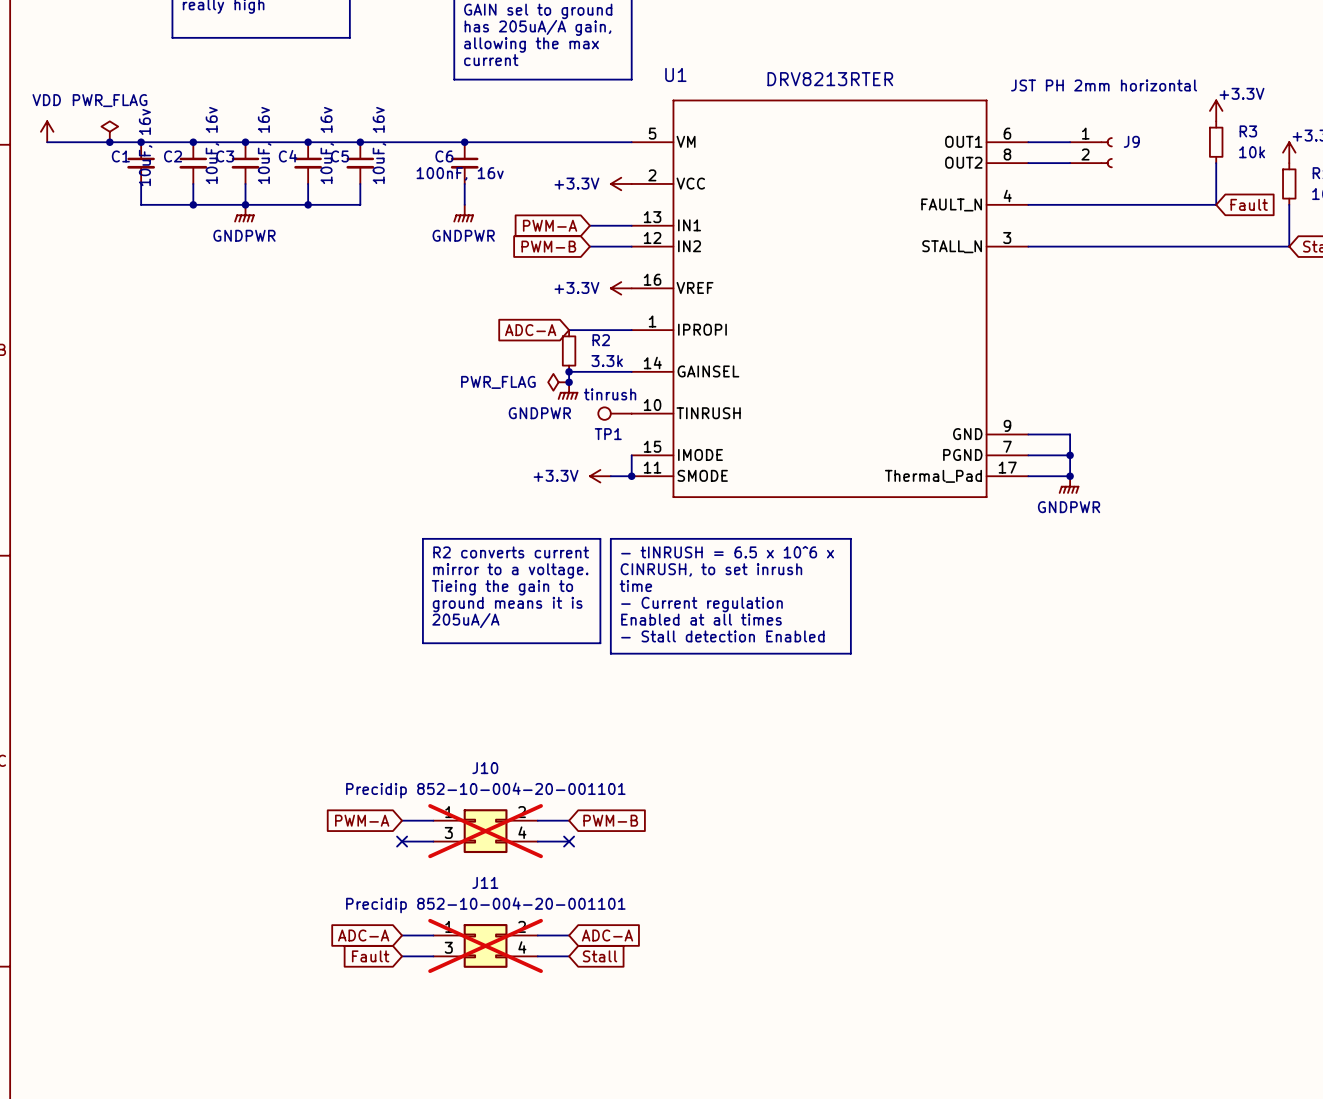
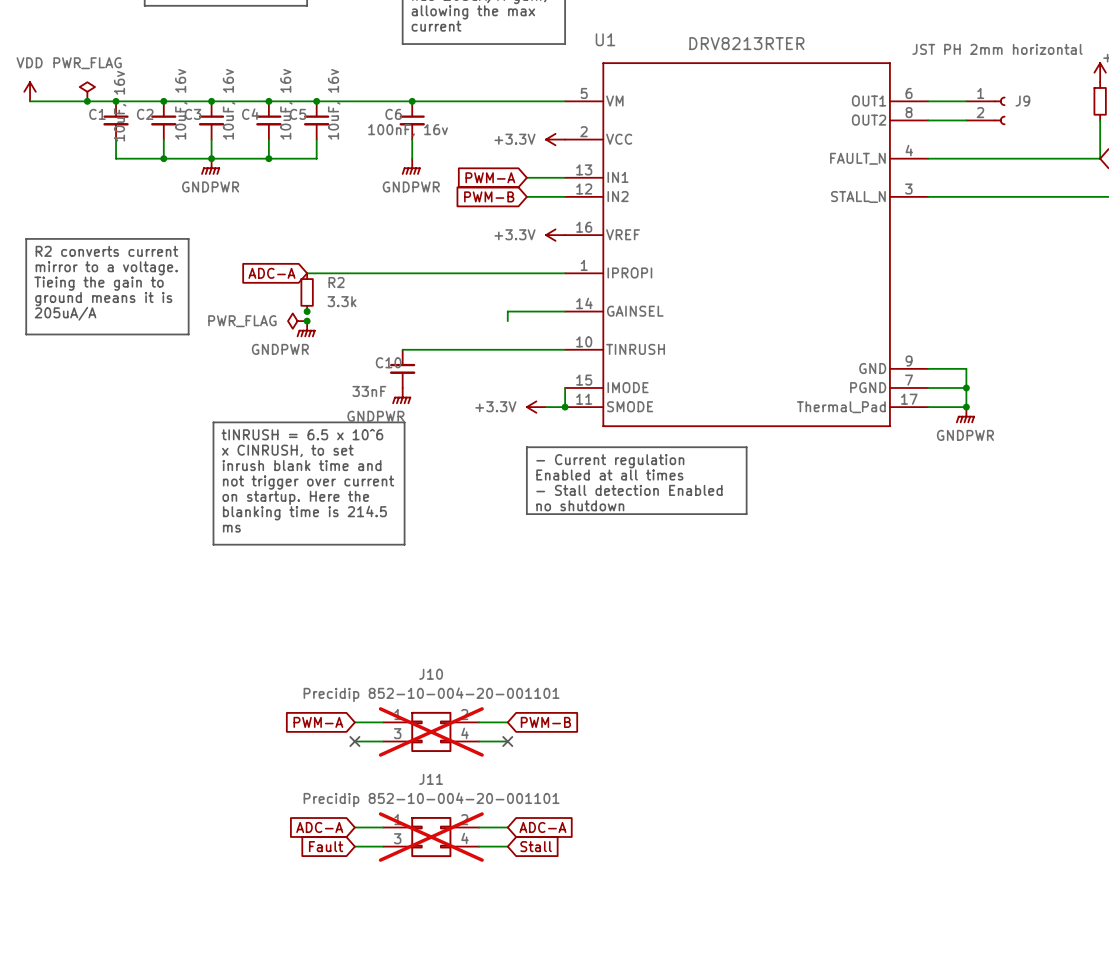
line: none -> (26, 238) (188, 238) (188, 334) (26, 334) (26, 238)
text: none -> R2 converts current (106, 251)
text: none -> mirror to a voltage. (106, 268)
global label: none -> ADC-A (271, 273)
wire: none -> (307, 273) (507, 273)
global label: ADC-A (530, 330) -> none
text: none -> Tieing the gain to (98, 283)
R2 position: (569, 350) -> (307, 292)
text: none -> ground means it is (103, 299)
junction: none -> (307, 311)
junction: (569, 371) -> none
text: none -> 205uA/A (65, 313)
power symbol: none -> PWR_FLAG (297, 321)
junction: none -> (307, 321)
power symbol: PWR_FLAG (558, 382) -> none
junction: (569, 382) -> none
power symbol: none -> GNDPWR (306, 329)
power symbol: GNDPWR (568, 391) -> none
wire: none -> (402, 349) (565, 349)
TP1: tinrush (615, 413) -> none
C10: none -> 33nF (402, 368)
power symbol: none -> GNDPWR (401, 396)
line: none -> (213, 422) (404, 422) (404, 544) (213, 544) (213, 422)
text: none -> tINRUSH = 6.5 x 10^6 (302, 434)
line: none -> (526, 447) (746, 447) (746, 514) (526, 514) (526, 447)
text: none -> x CINRUSH, to set (287, 450)
line: (422, 538) (600, 538) (600, 643) (422, 643) (422, 538) -> none
line: (610, 538) (850, 538) (850, 653) (610, 653) (610, 538) -> none
text: none -> inrush blank time and (301, 465)
text: R2 converts current (511, 552) -> not trigger over current (308, 482)
text: - tINRUSH = 6.5 x 10^6 x (727, 552) -> none
text: CINRUSH, to set inrush (711, 569) -> none
text: mirror to a voltage. (510, 570) -> none
text: none -> on startup. Here the (295, 497)
text: none -> no shutdown (580, 505)
text: time (635, 586) -> none
text: Tieing the gain to (502, 587) -> none
text: none -> blanking time is 214.5 (304, 513)
text: ground means it is (507, 604) -> none
text position: - Current regulation (701, 604) -> - Current regulation (610, 461)
text: none -> ms (231, 528)
text position: Enabled at all times (701, 619) -> Enabled at all times (609, 475)
text: 205uA/A (465, 620) -> none
text position: - Stall detection Enabled (722, 636) -> - Stall detection Enabled (629, 490)

